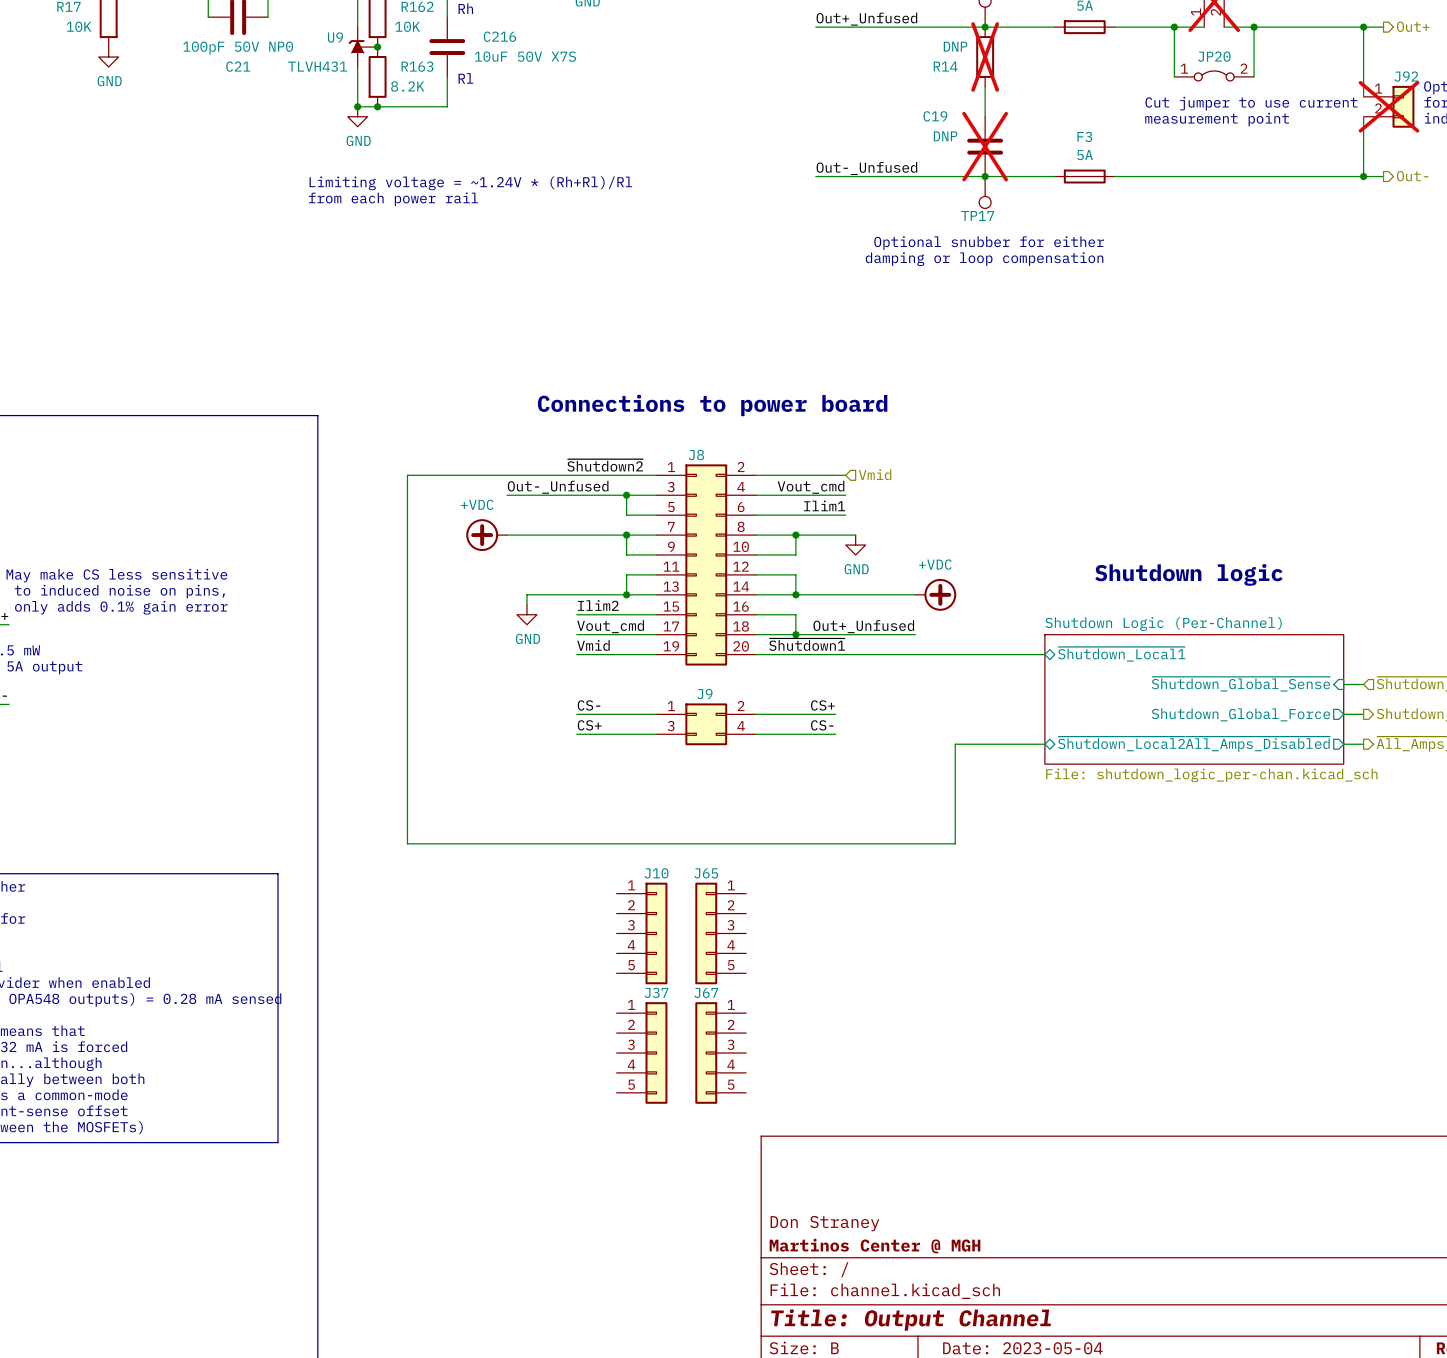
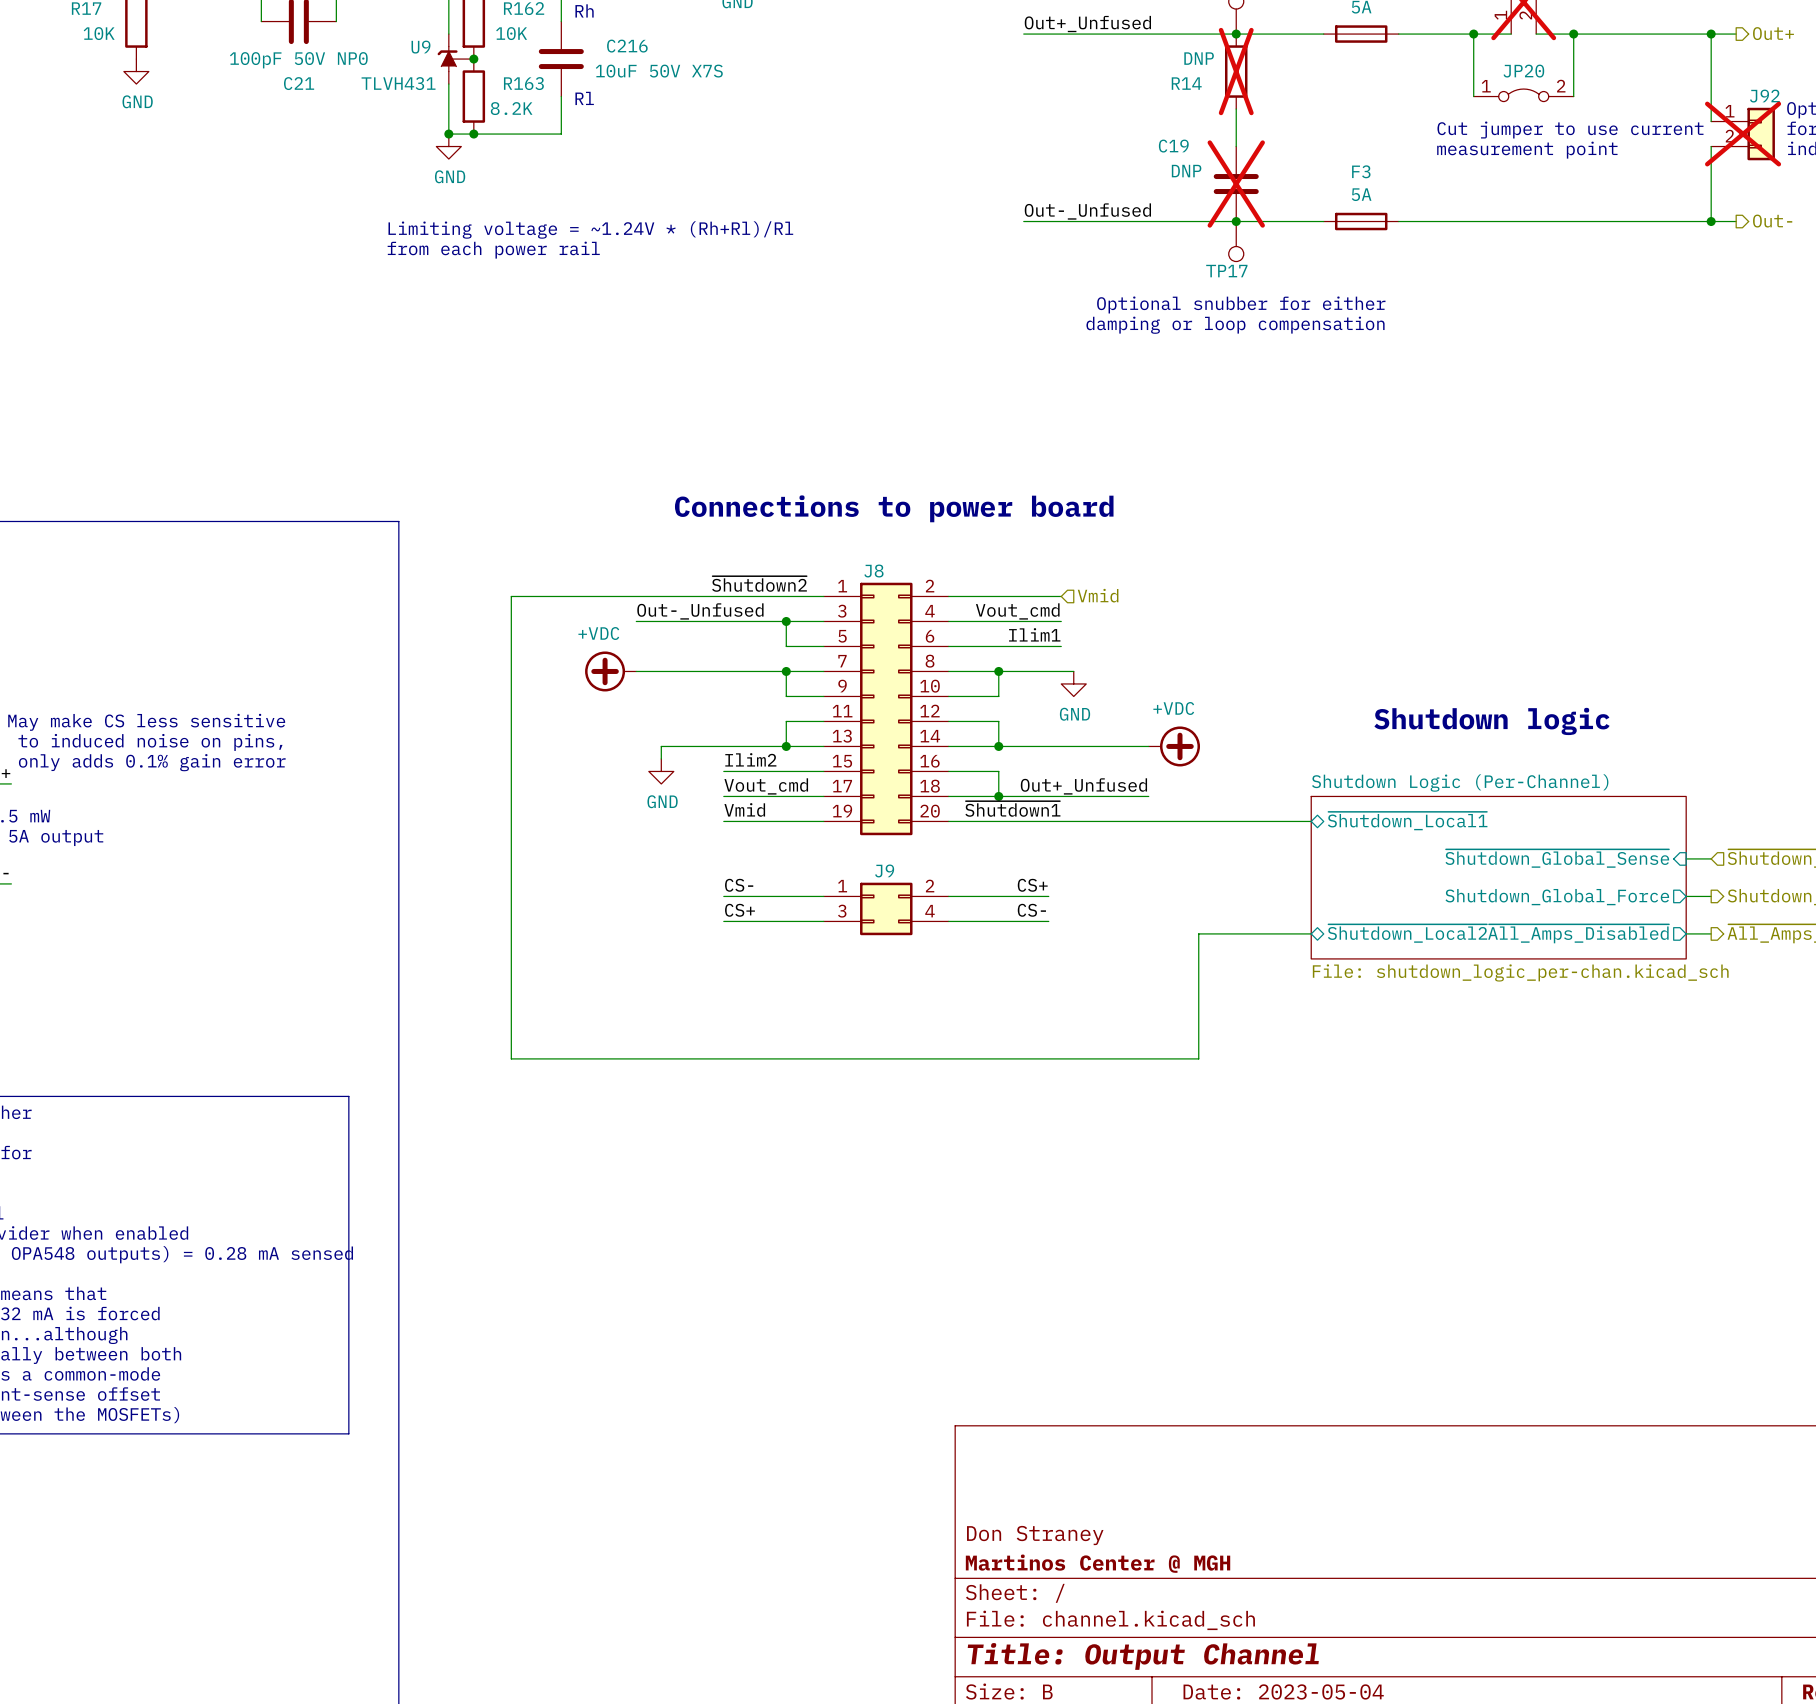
J10: (642, 933) -> none
J65: (720, 933) -> none
J37: (642, 1052) -> none
J67: (720, 1052) -> none

